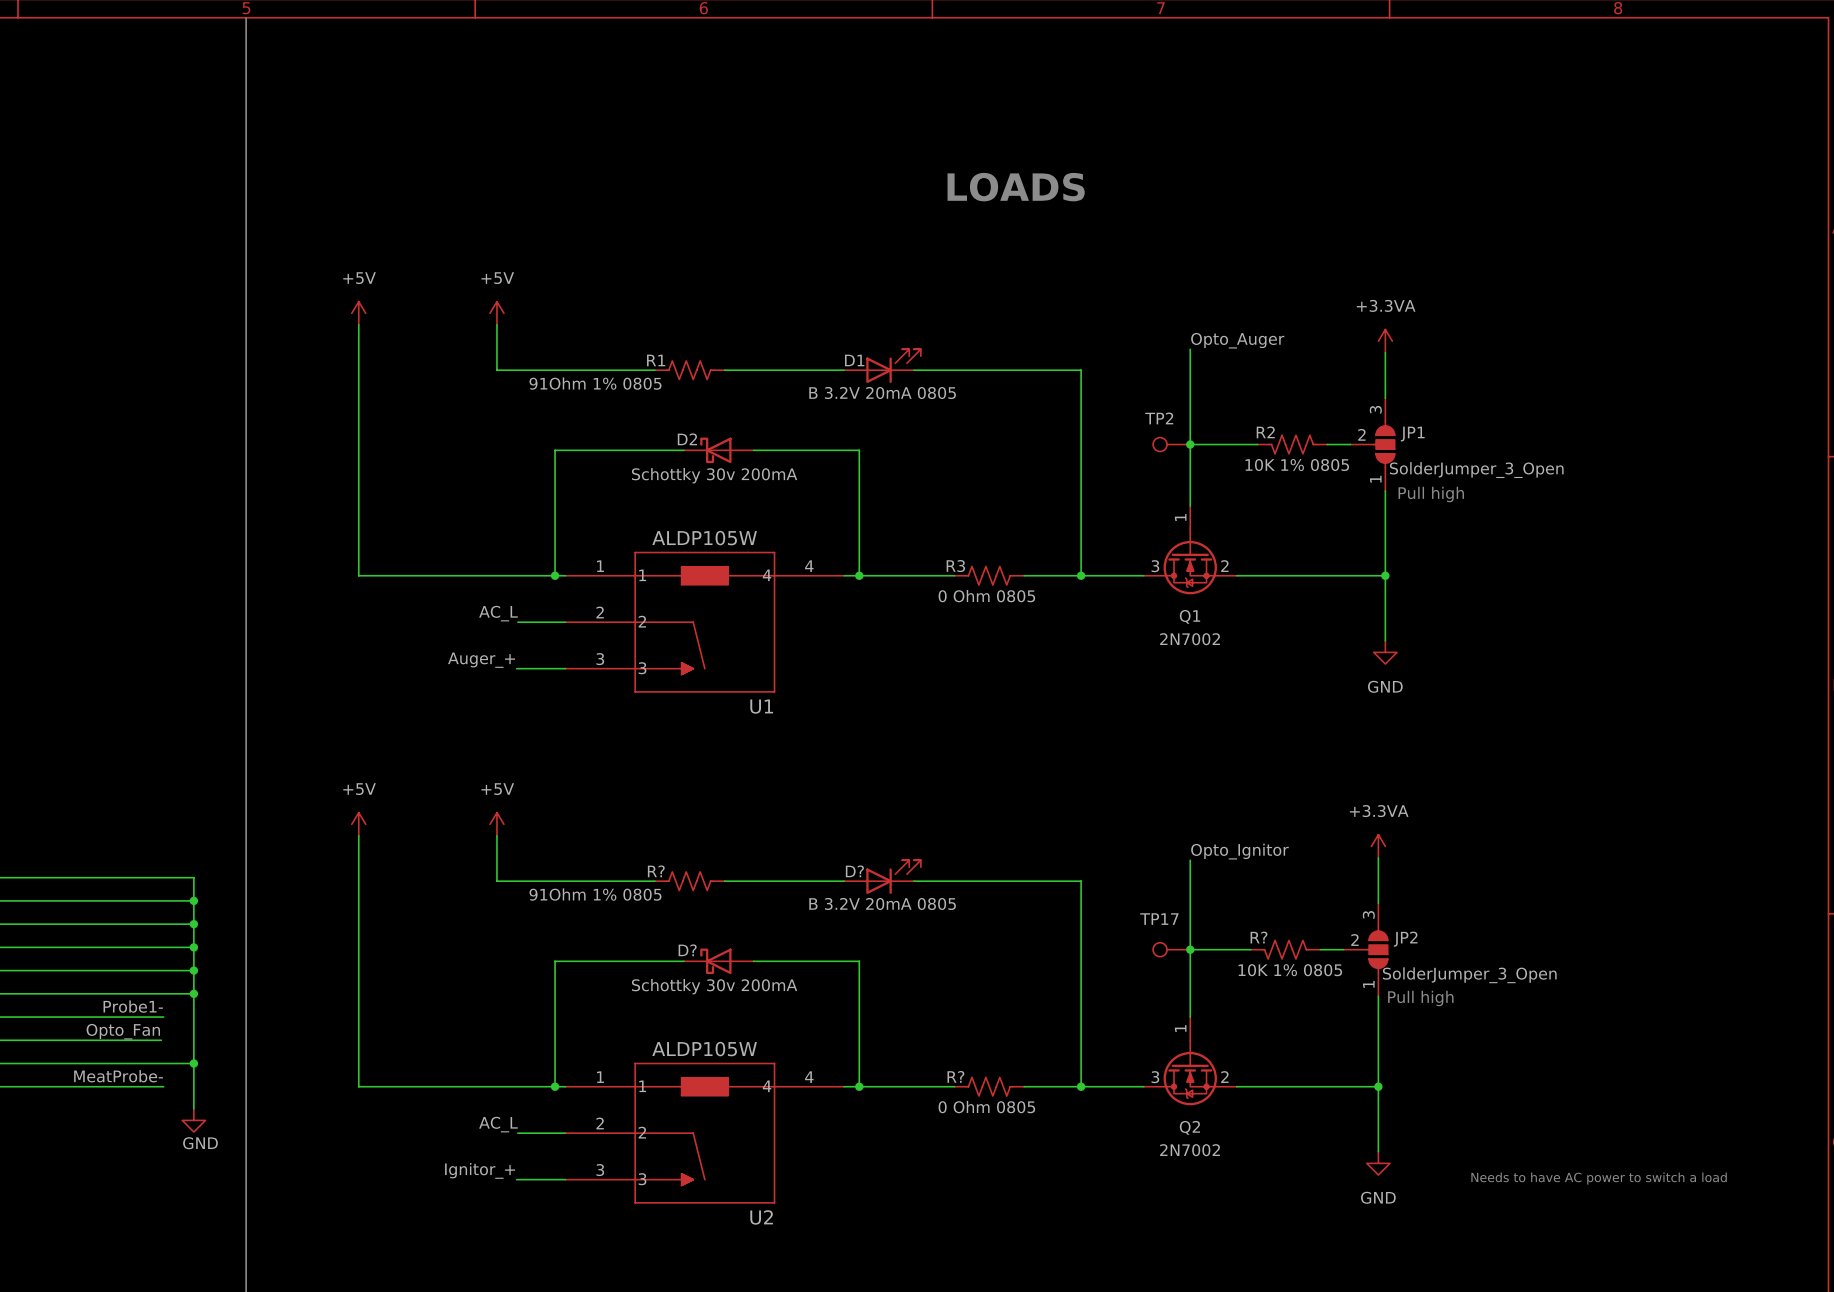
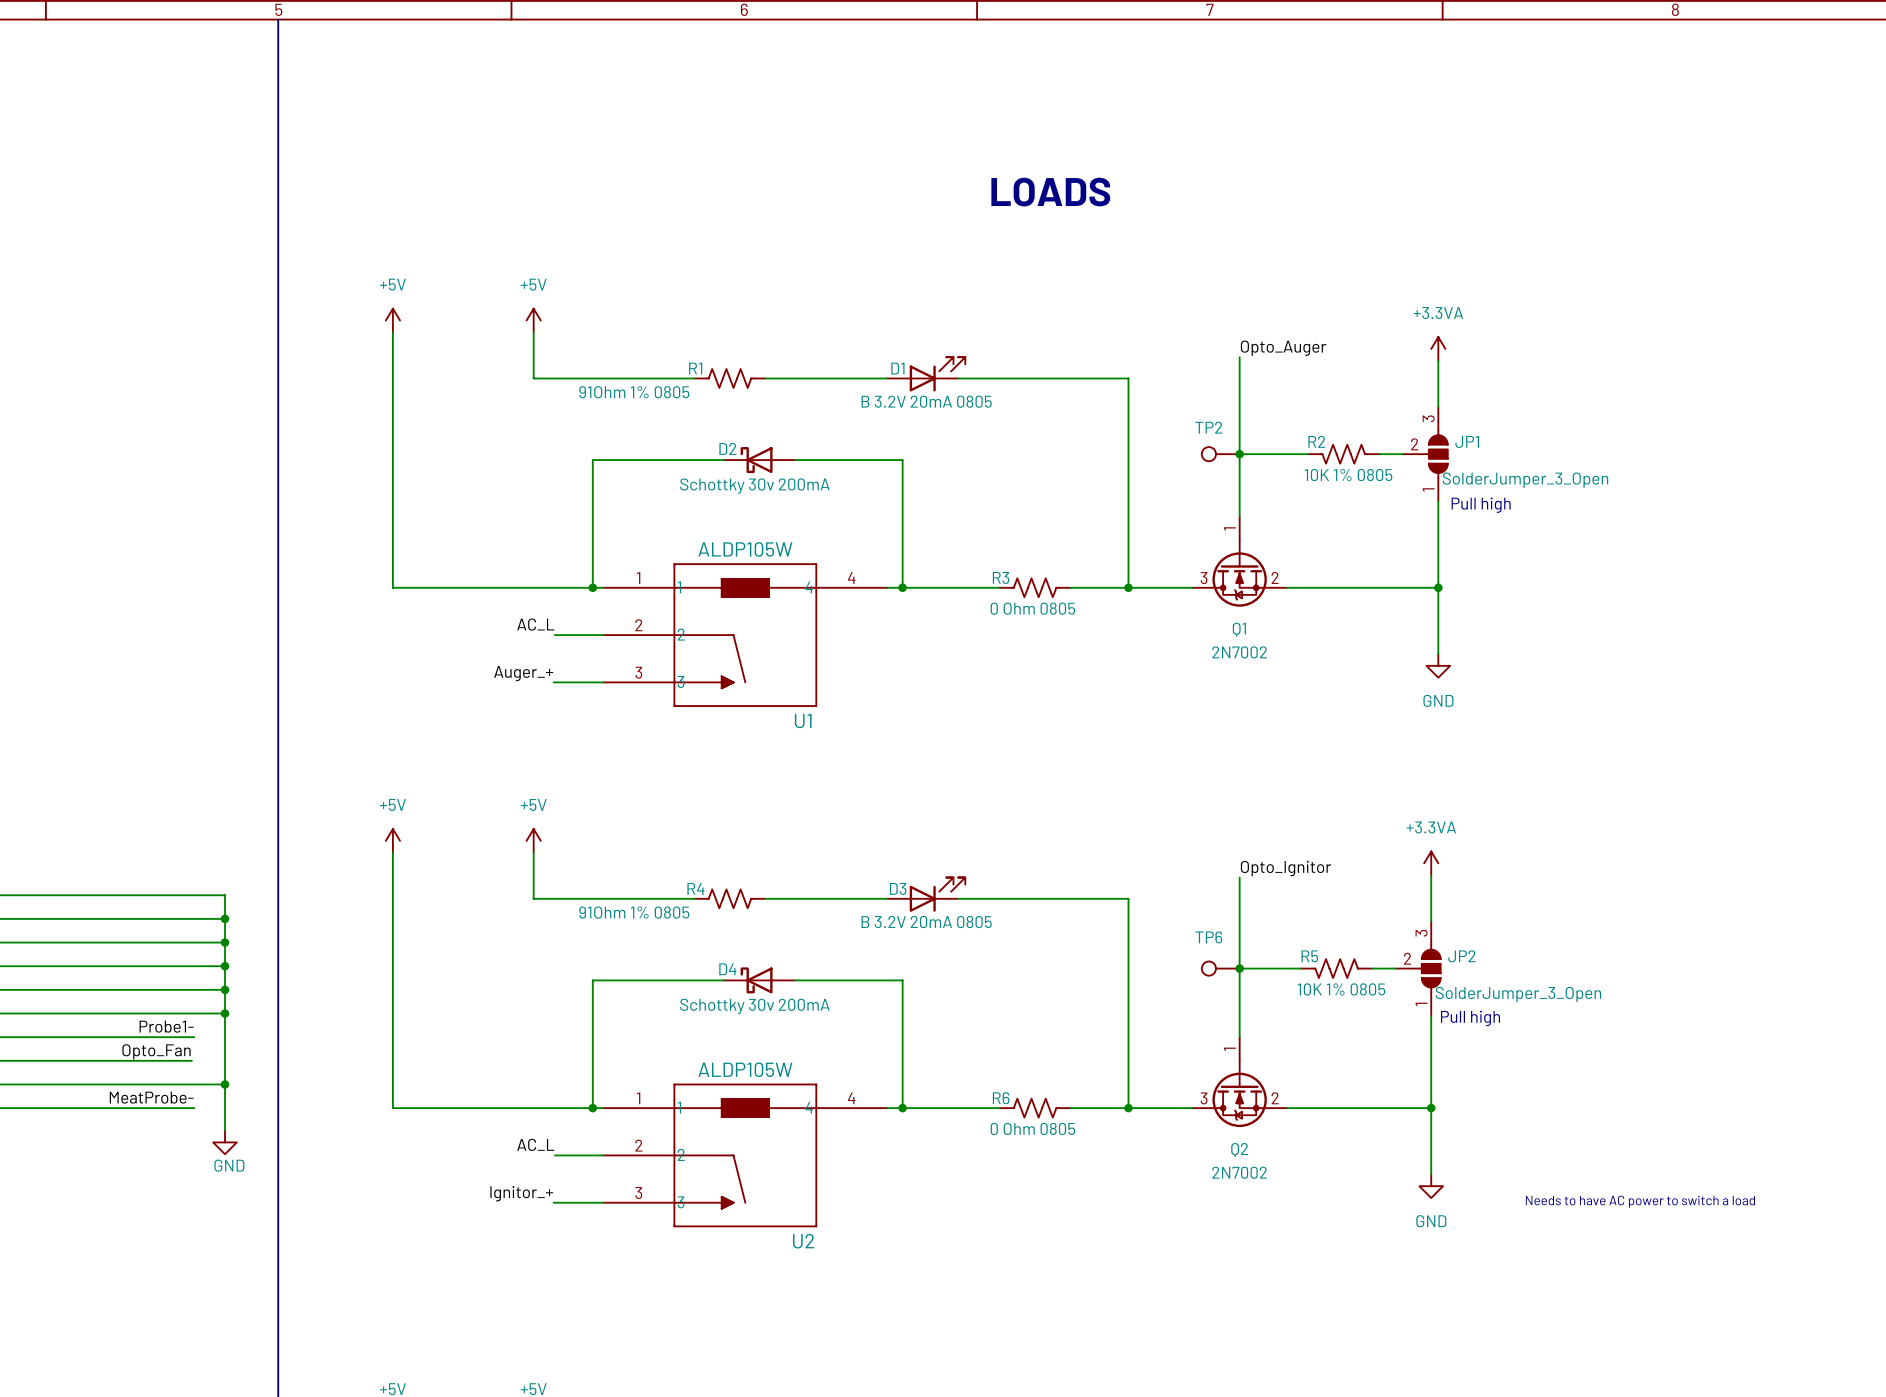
R? name: R? (656, 871) -> R4 (695, 888)
D? name: D? (854, 871) -> D3 (898, 888)
TP17 name: TP17 (1159, 919) -> TP6 (1208, 937)
R? name: R? (1259, 937) -> R5 (1309, 956)
D? name: D? (687, 950) -> D4 (727, 969)
R? name: R? (955, 1076) -> R6 (1001, 1098)

